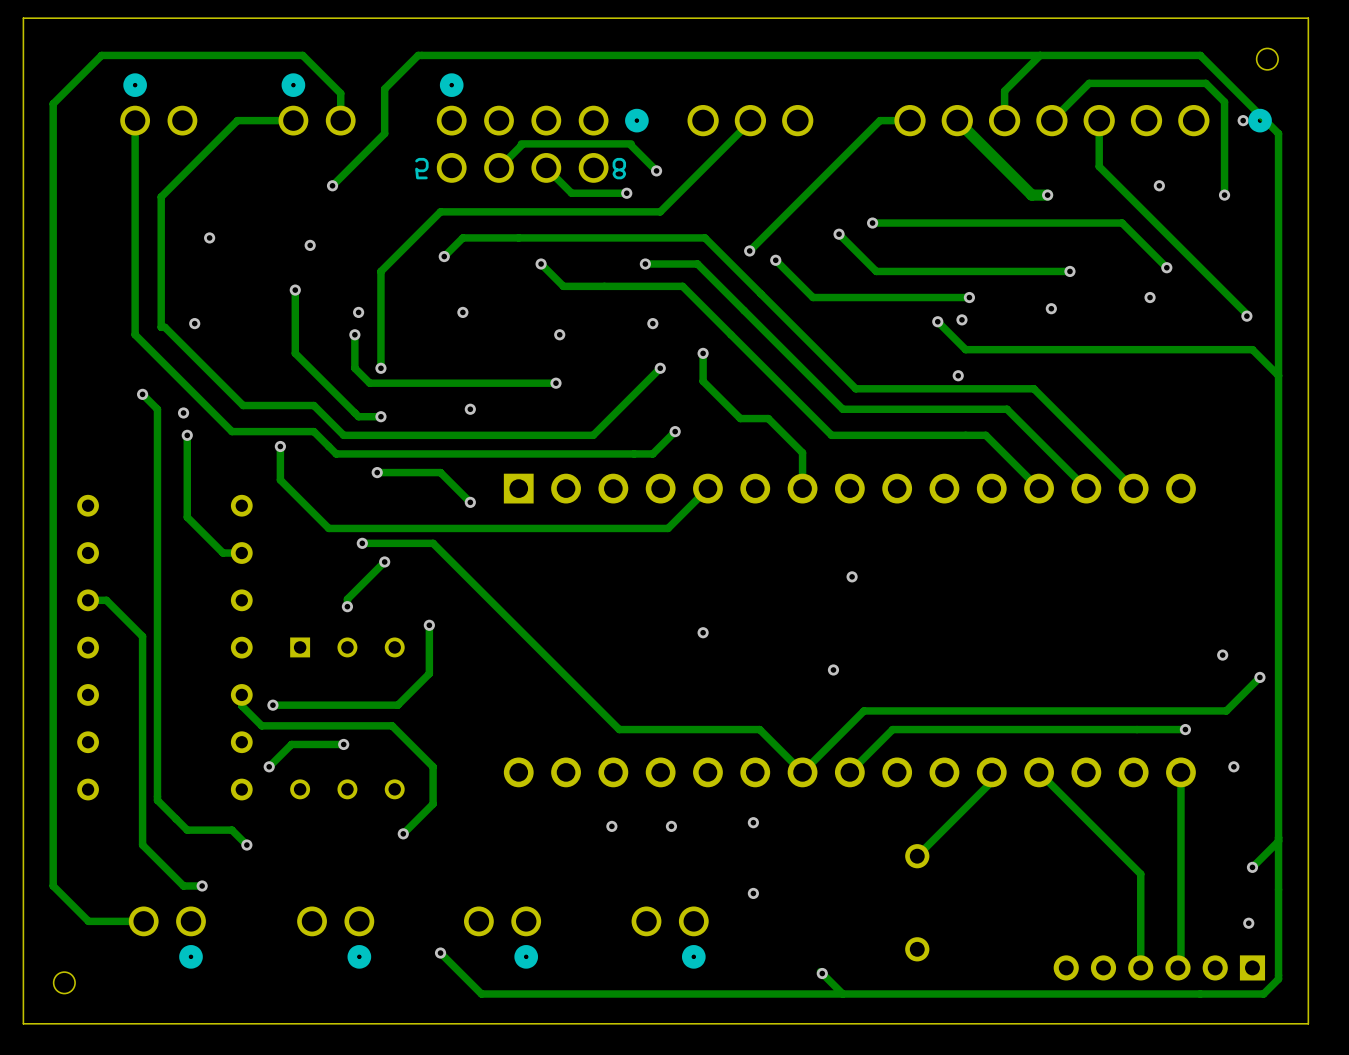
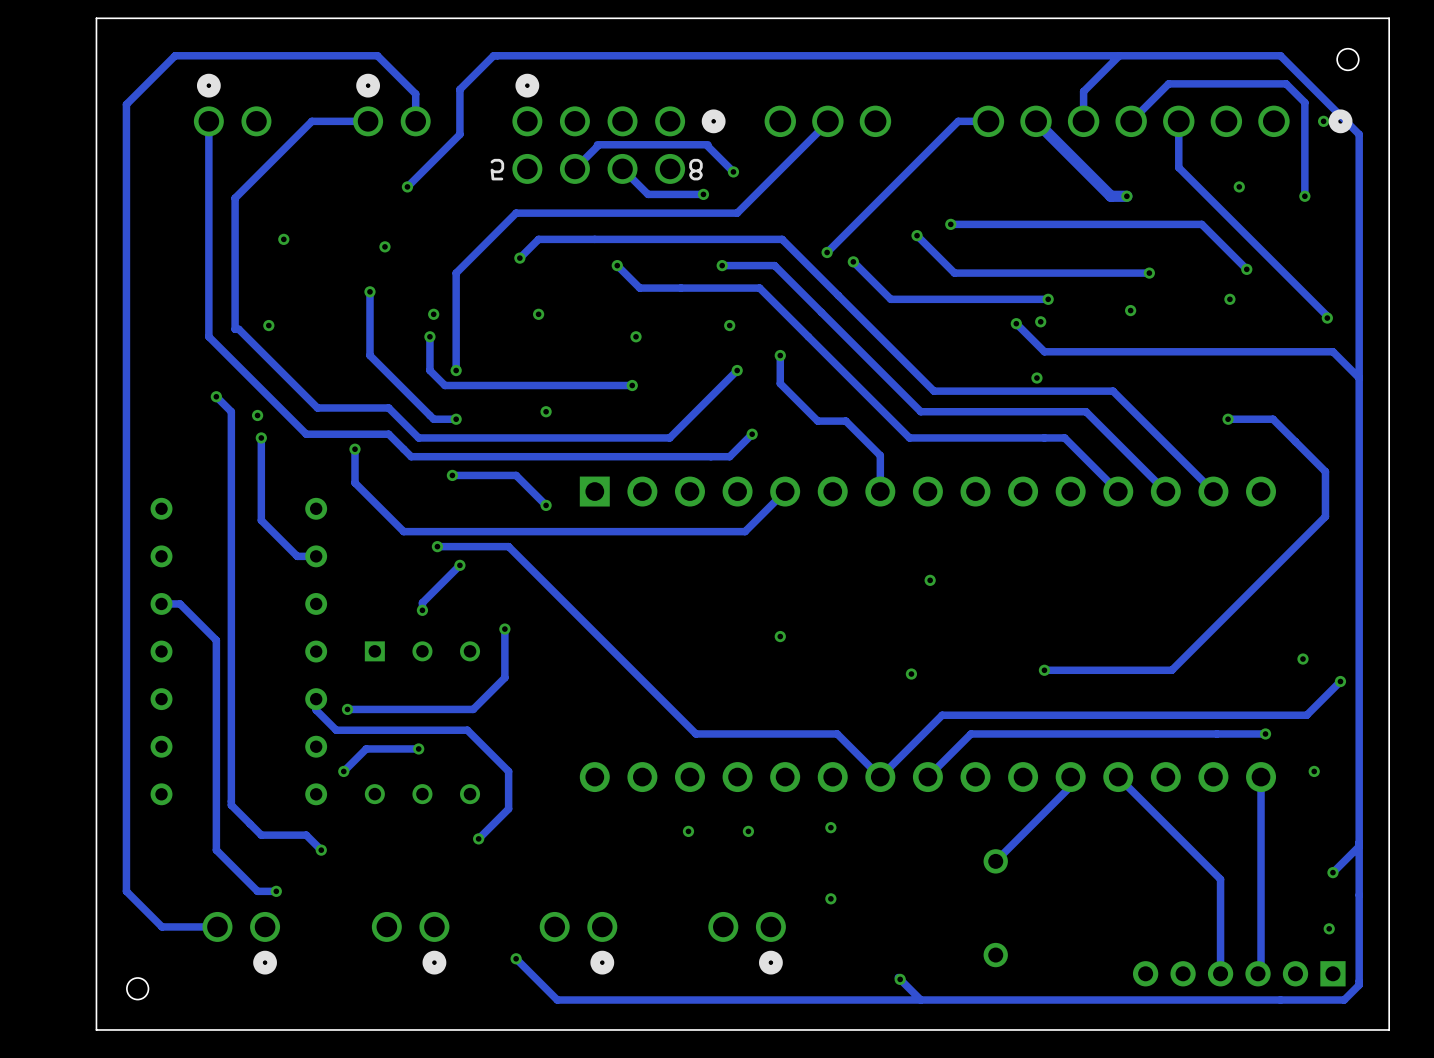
track: none -> (1228, 419) (1273, 419) (1325, 471) (1325, 516) (1171, 670) (1044, 670)
via: none -> (1228, 419)
via: none -> (1044, 670)

